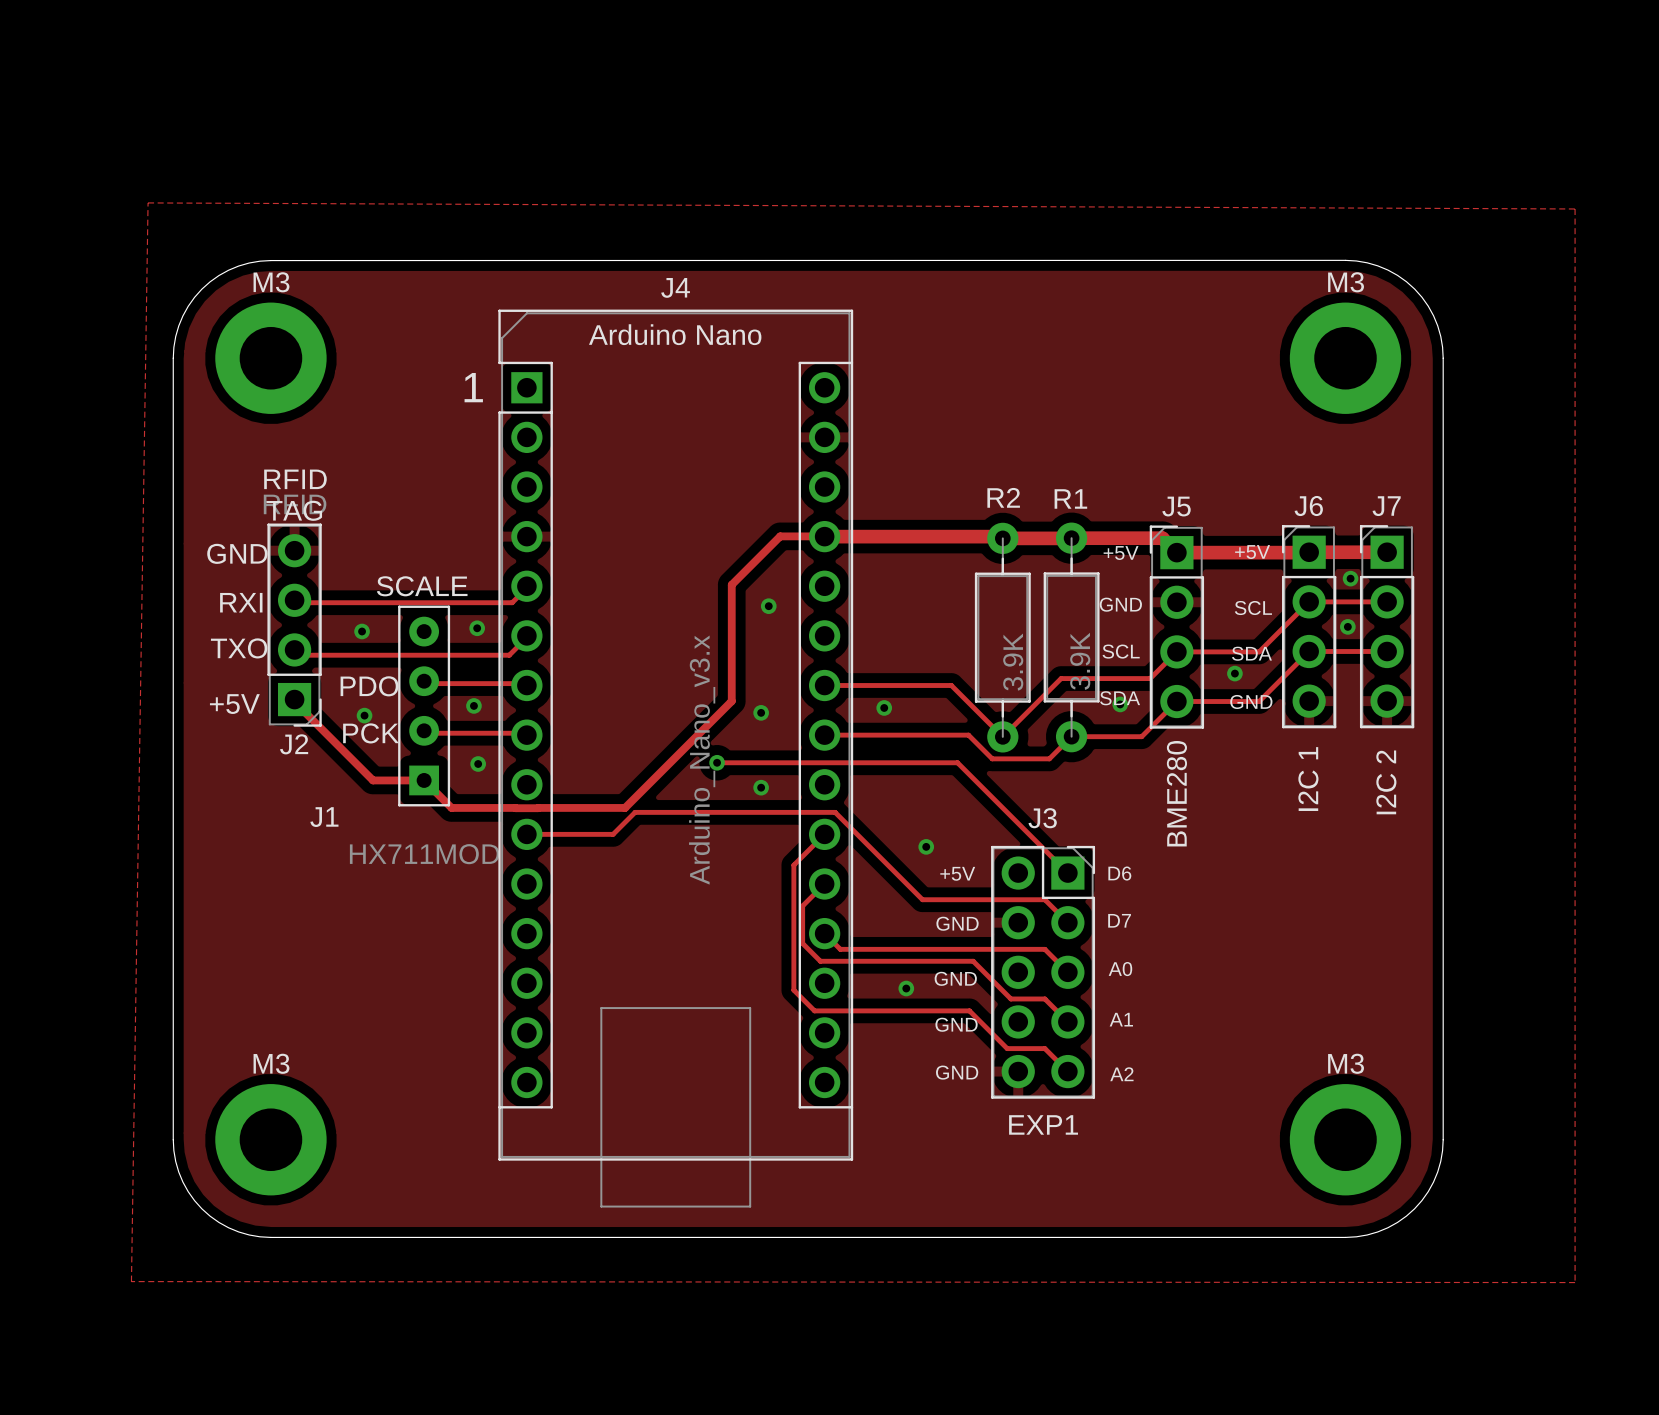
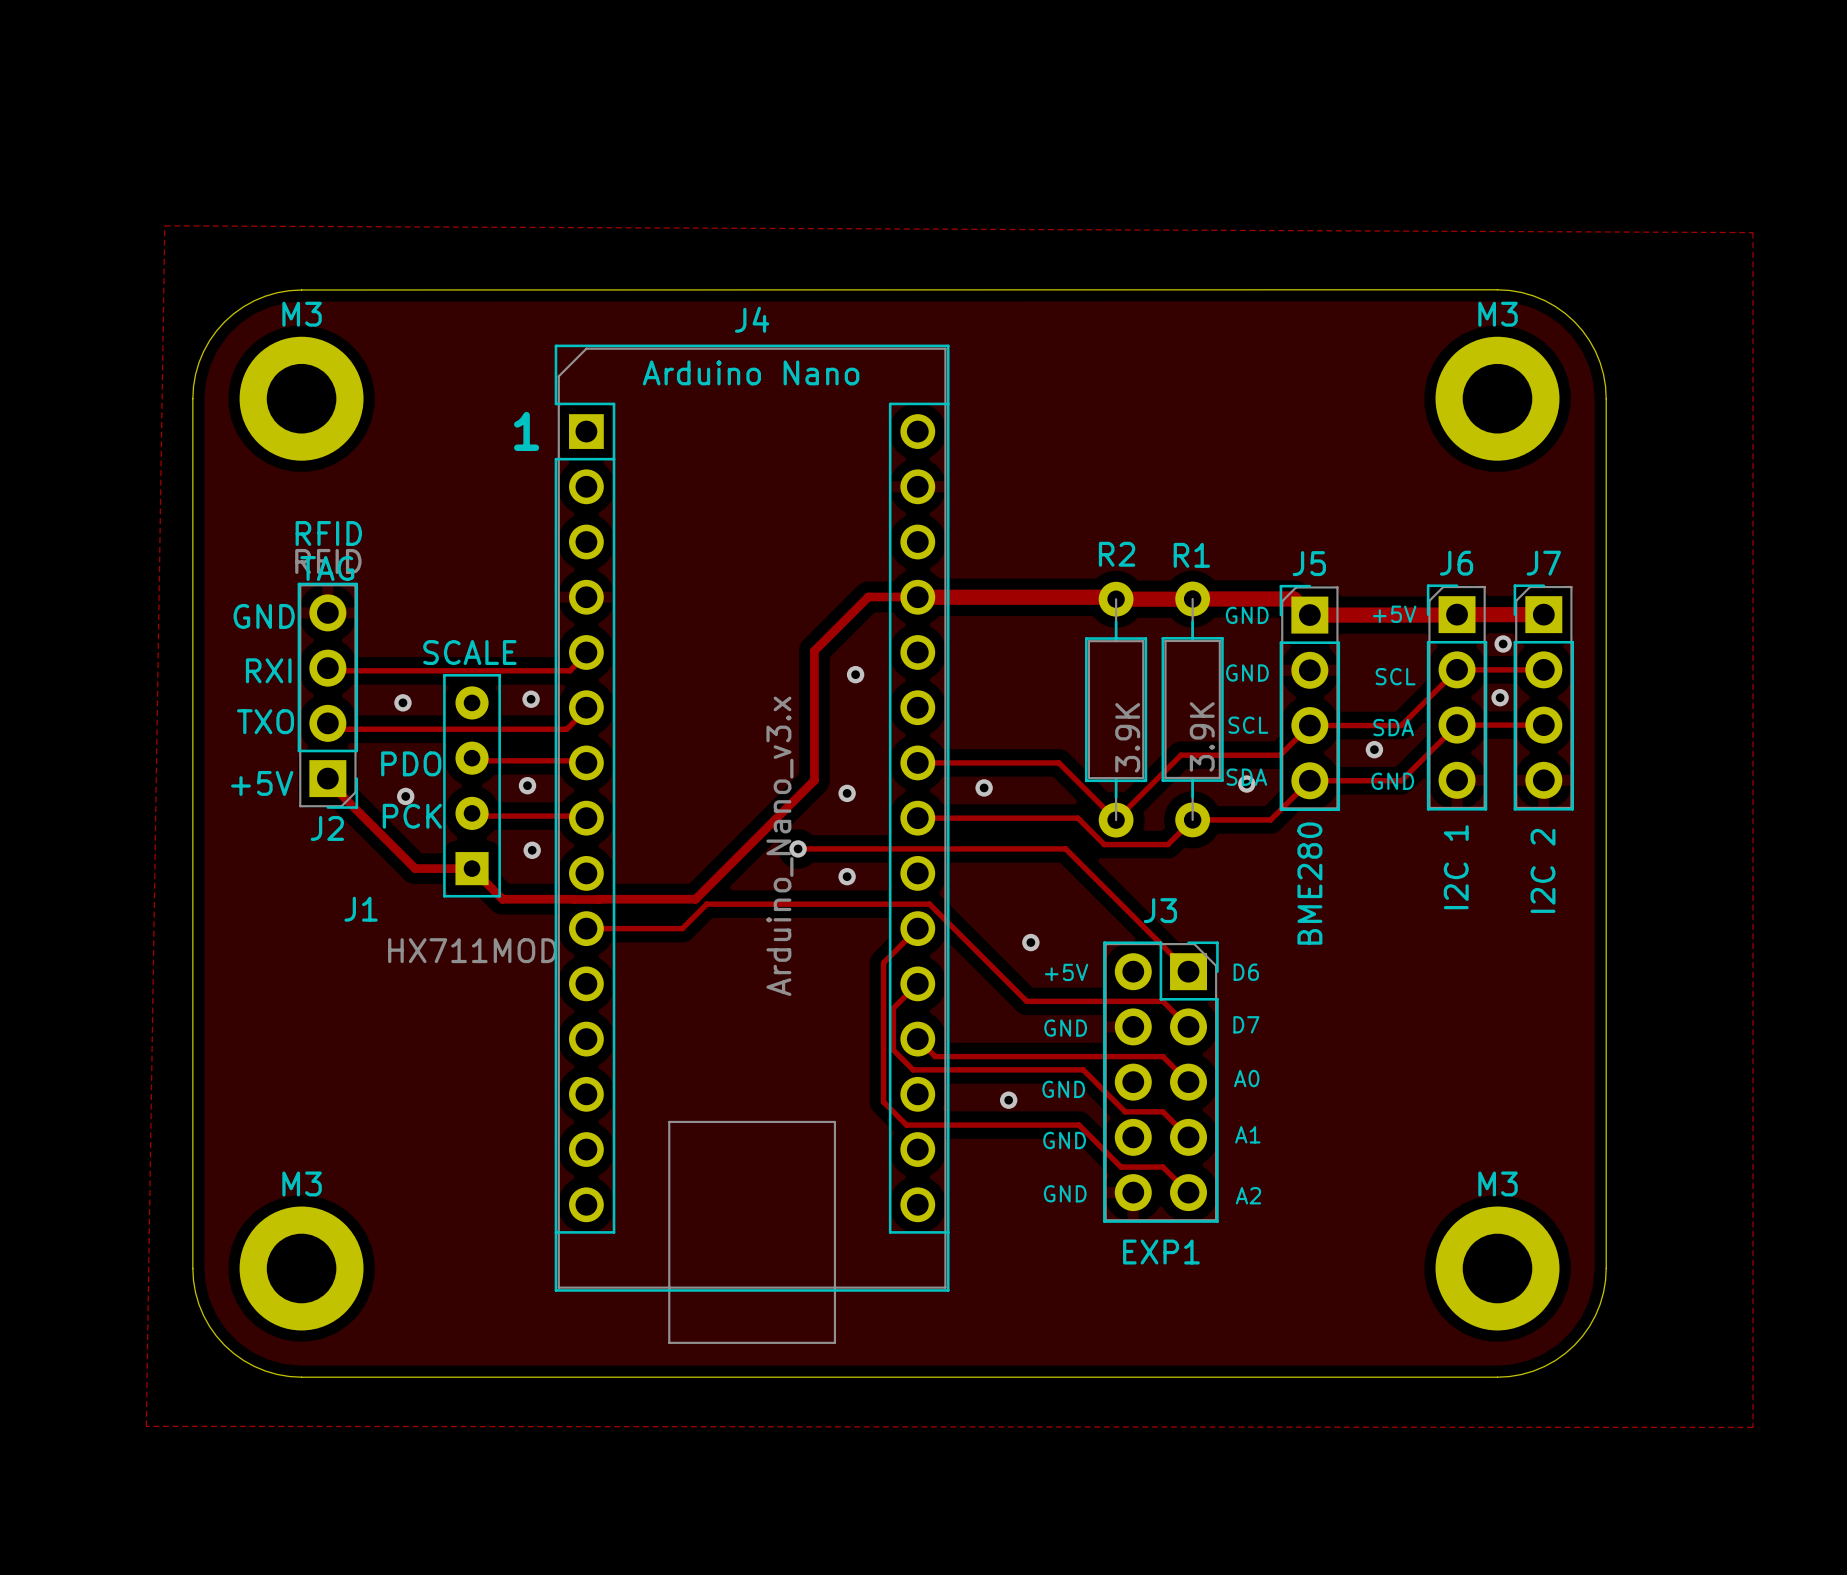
text: +5V (1121, 553) -> GND (1247, 615)

